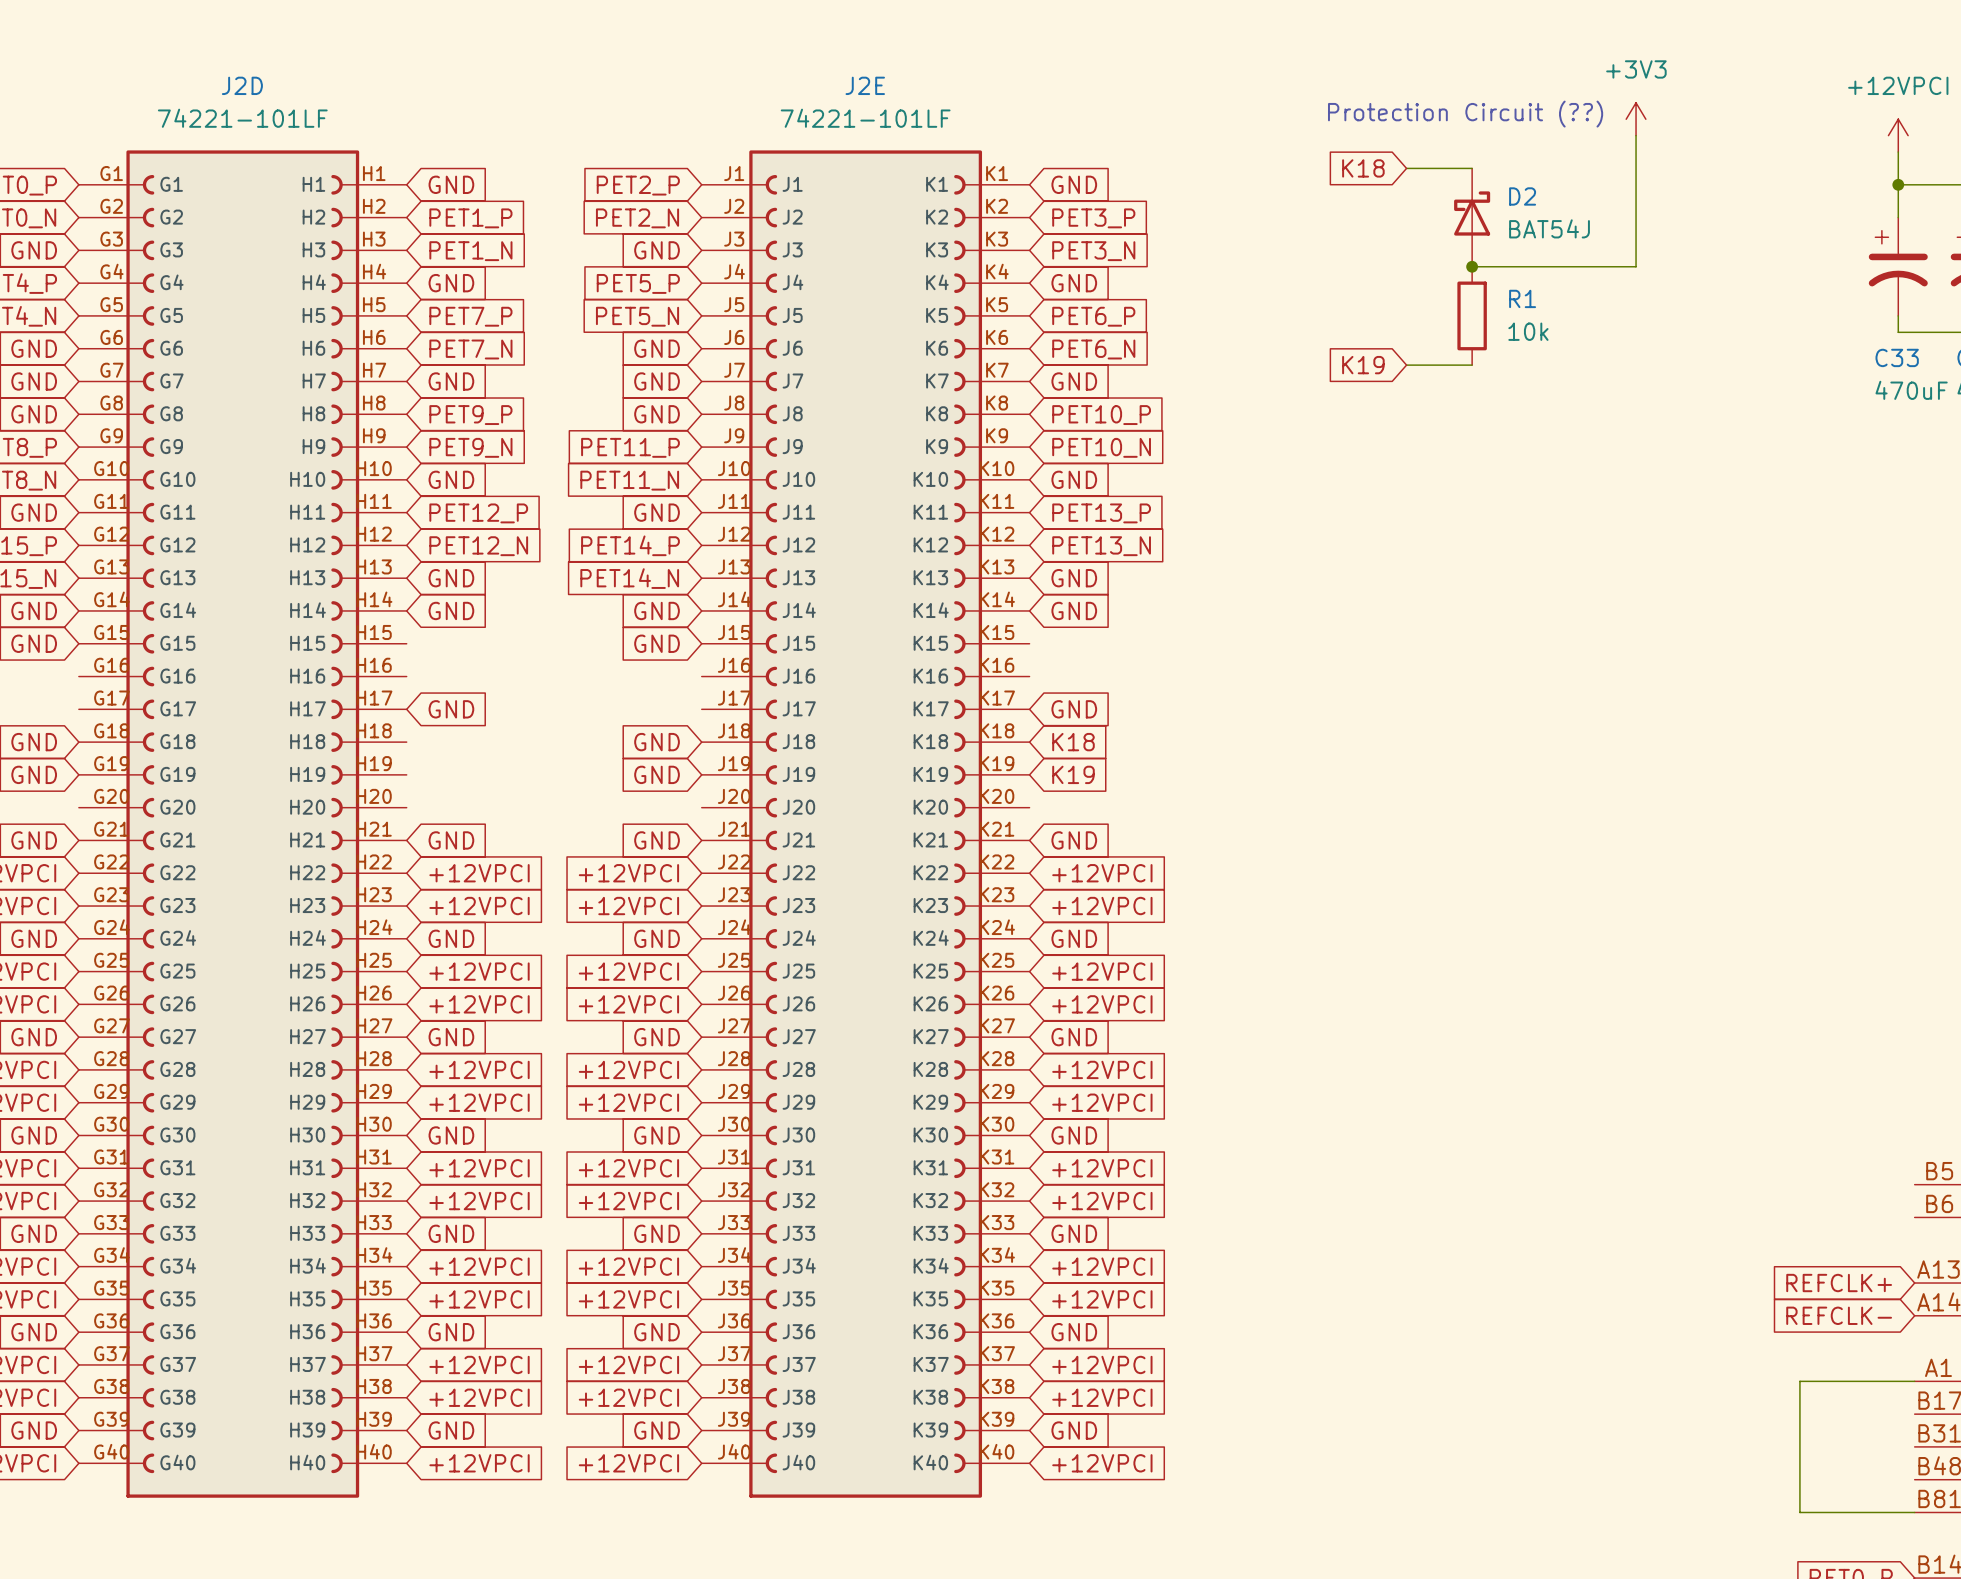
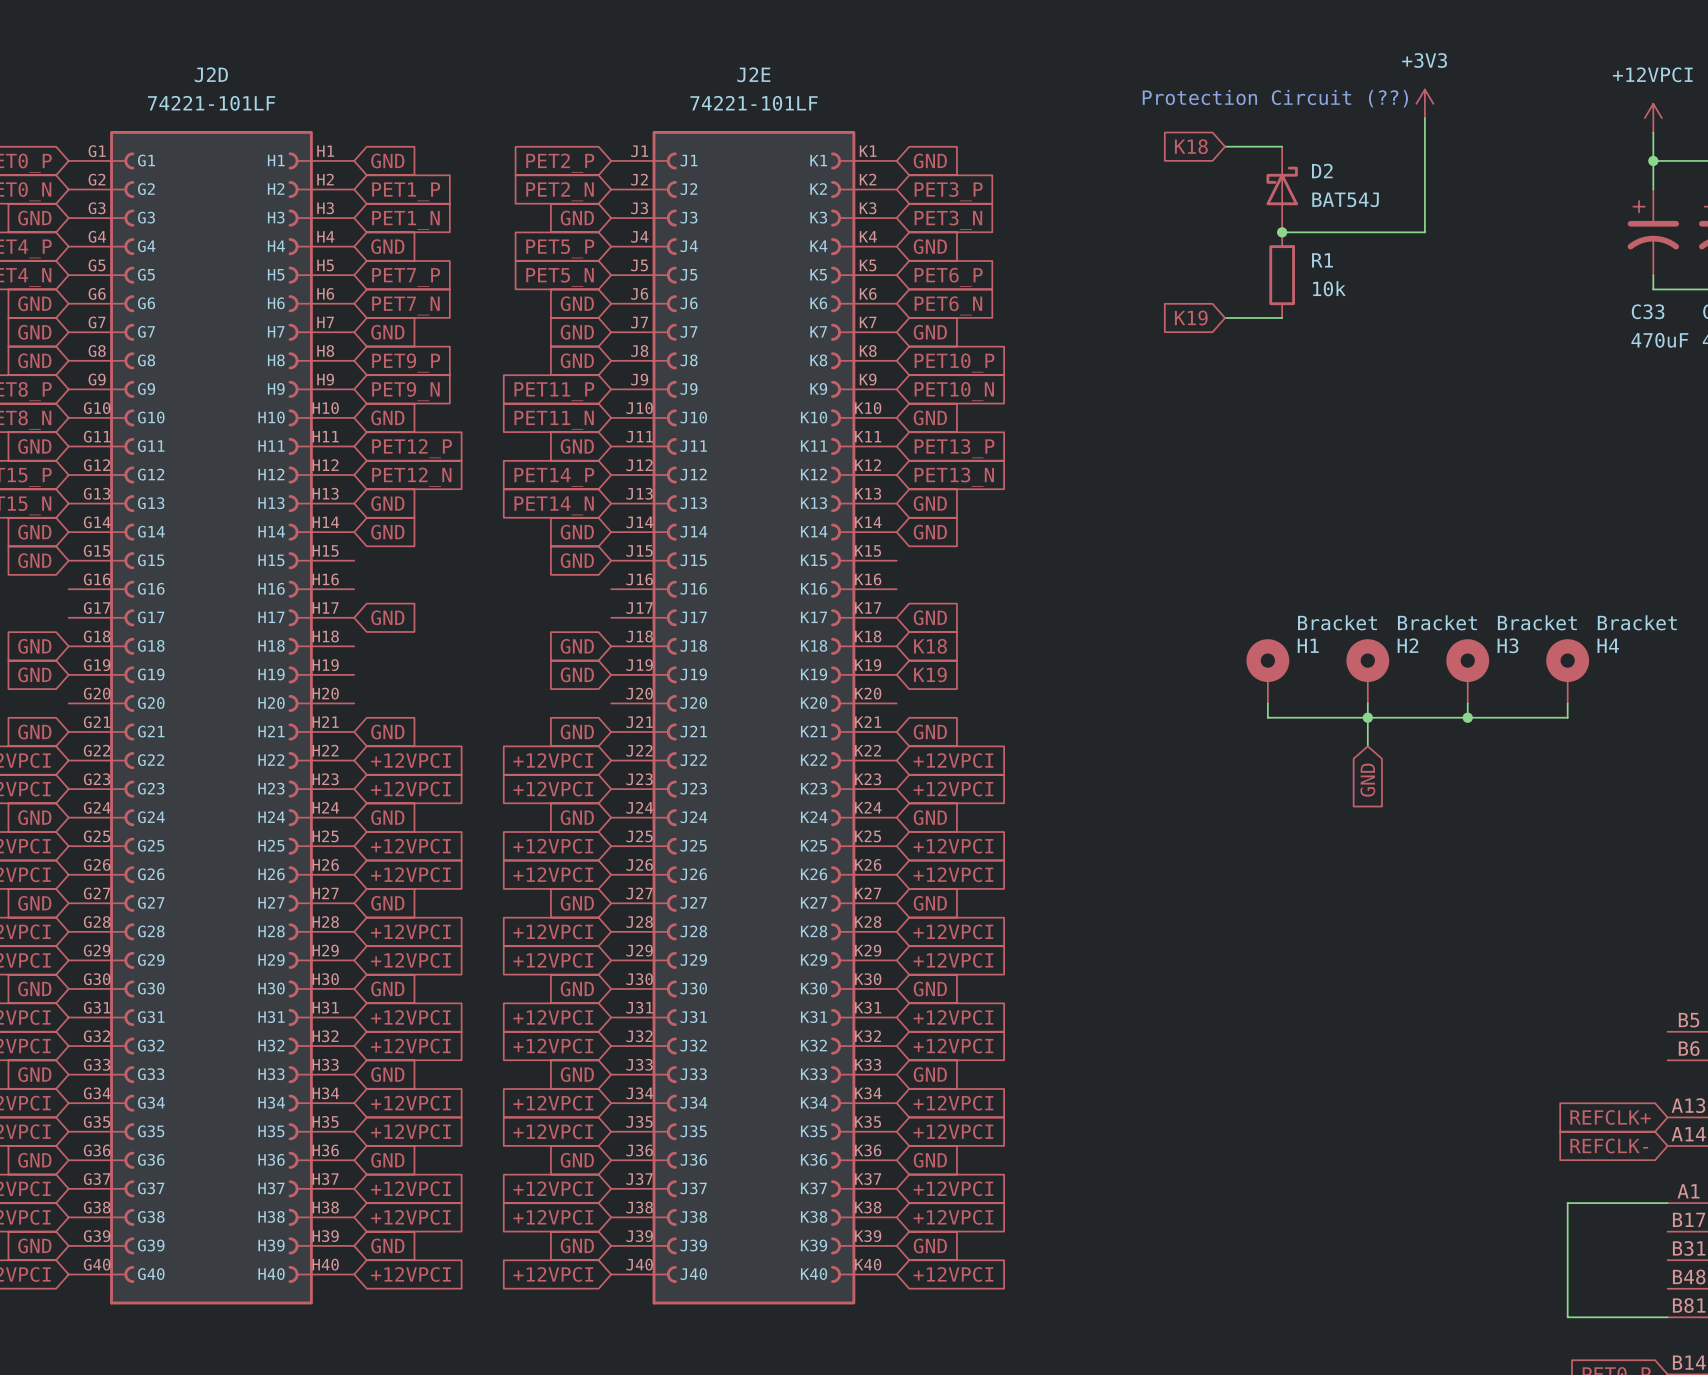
H1: none -> Bracket (1267, 671)
H2: none -> Bracket (1367, 671)
H3: none -> Bracket (1467, 671)
H4: none -> Bracket (1567, 671)
wire: none -> (1267, 703) (1267, 717) (1567, 717) (1567, 703)
wire: none -> (1367, 703) (1367, 746)
wire: none -> (1467, 703) (1467, 717)
junction: none -> (1367, 717)
junction: none -> (1467, 717)
global label: none -> GND (1367, 780)

